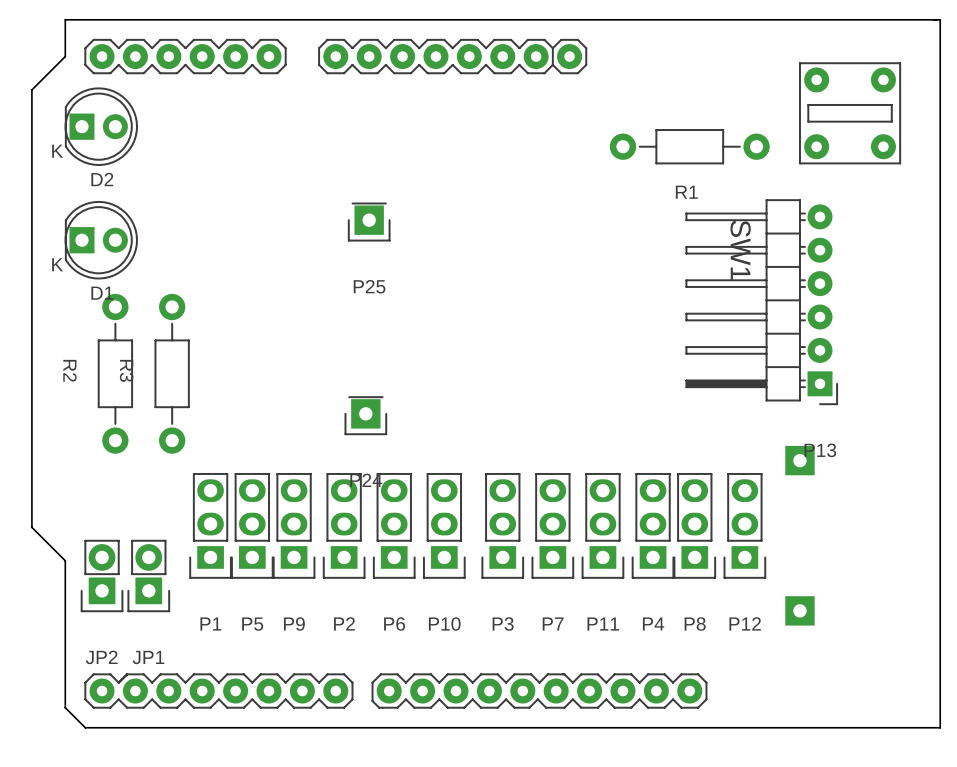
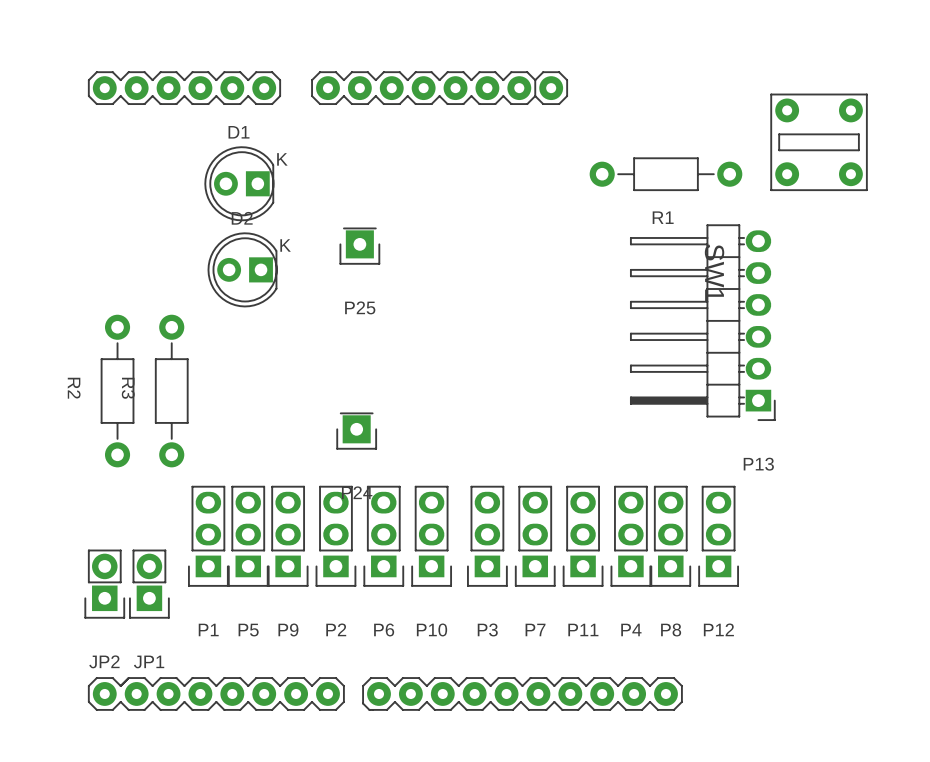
board edge: (940, 19) (65, 19) (65, 56) (31, 89) (31, 527) (65, 560) (65, 707) (85, 727) (940, 727) (940, 19) -> none
D2 rotation: 0° (101, 126) -> 180° (242, 269)
D2 position: (101, 126) -> (242, 269)
P13 footprint: [685, 199, 839, 406] -> [629, 224, 776, 422]
D1 rotation: 0° (101, 240) -> 180° (239, 183)
D1 position: (101, 240) -> (239, 183)
part: (799, 460) -> none
part: (799, 610) -> none

